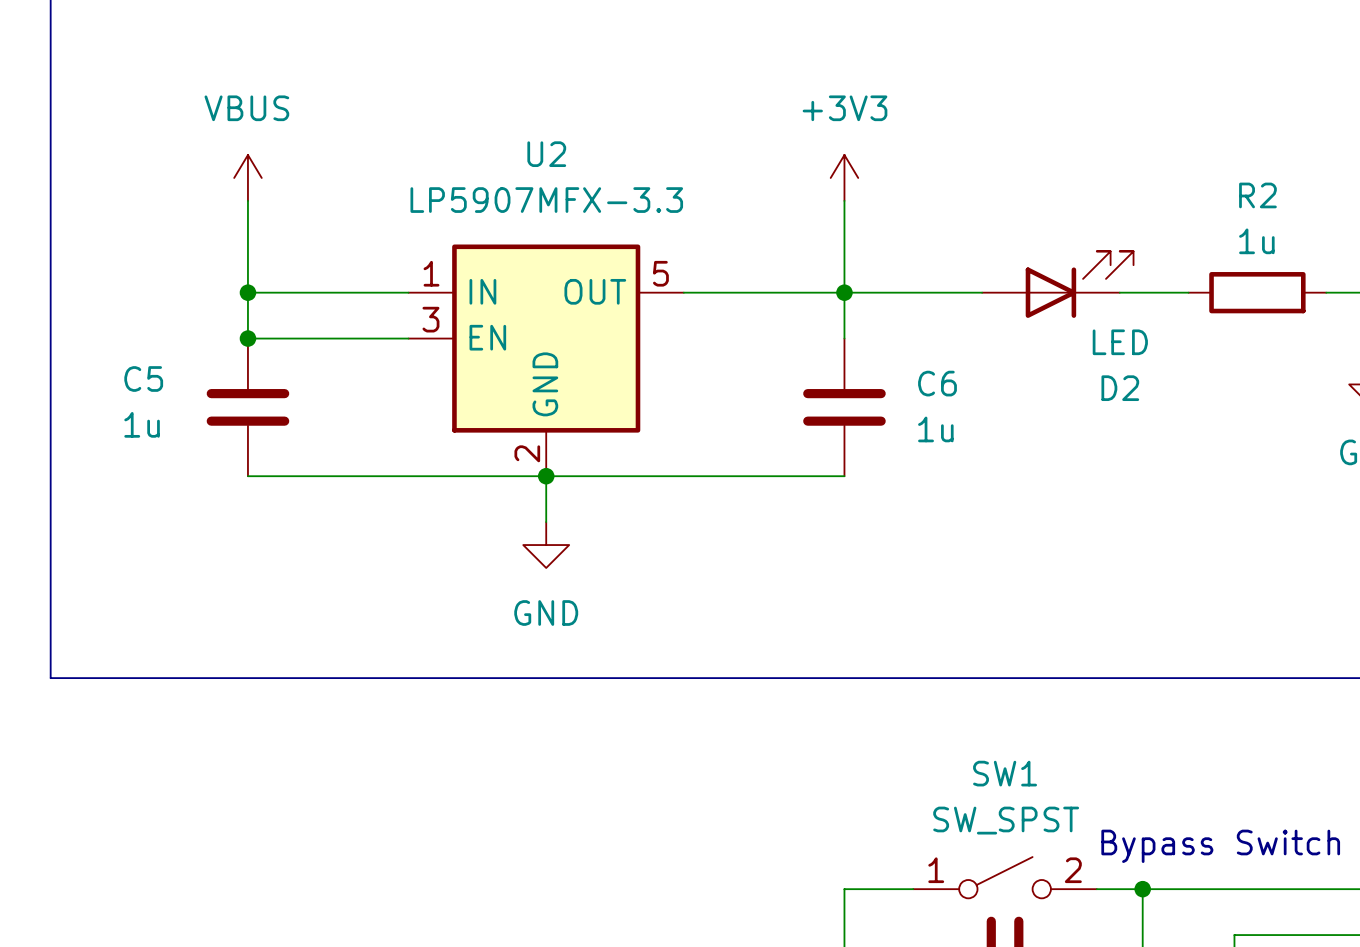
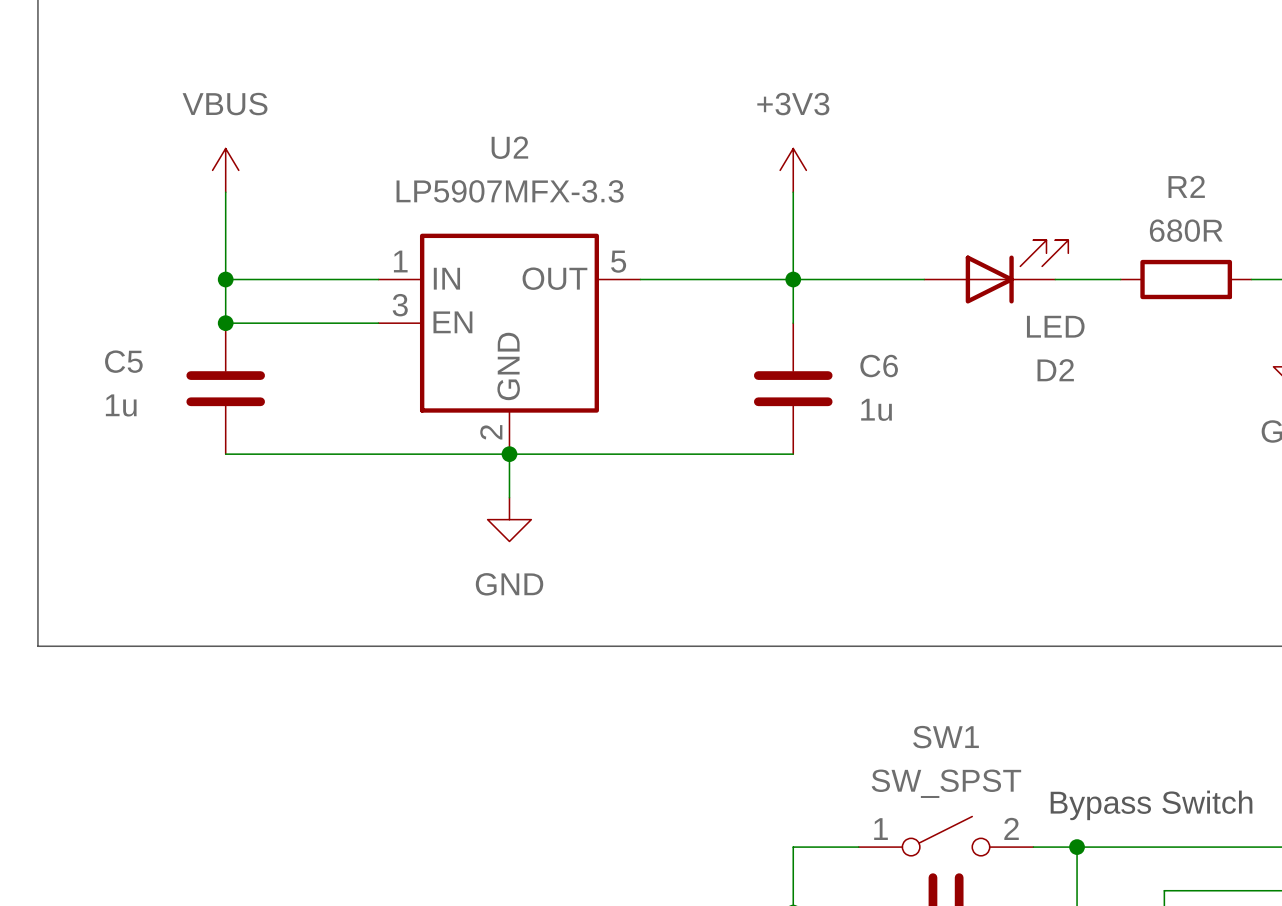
R2 value: 1u (1256, 241) -> 680R (1186, 230)

